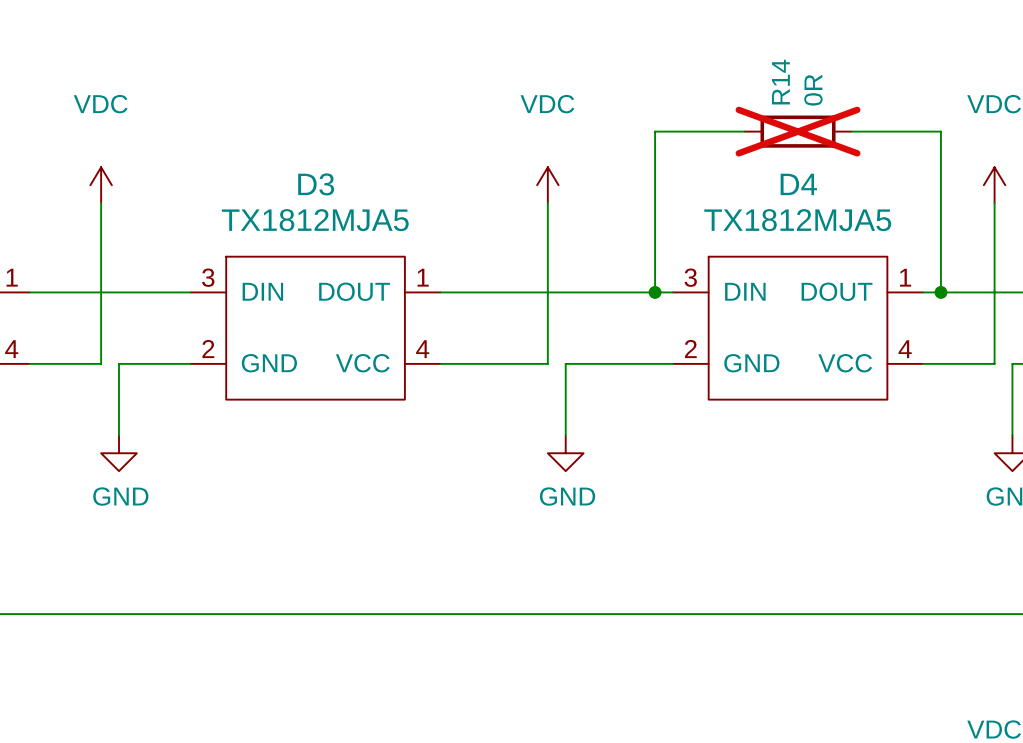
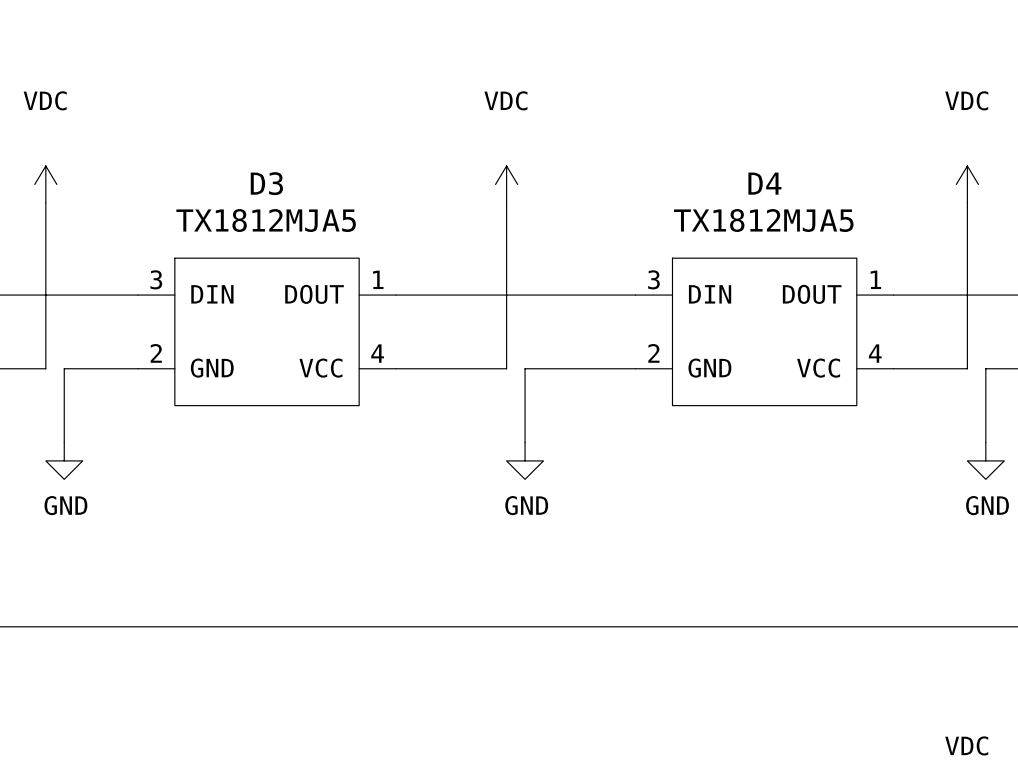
wire: (744, 131) (655, 131) (655, 292) -> none
R14: 0R (798, 131) -> none
wire: (851, 131) (940, 131) (940, 292) -> none
junction: (655, 292) -> none
junction: (940, 292) -> none

